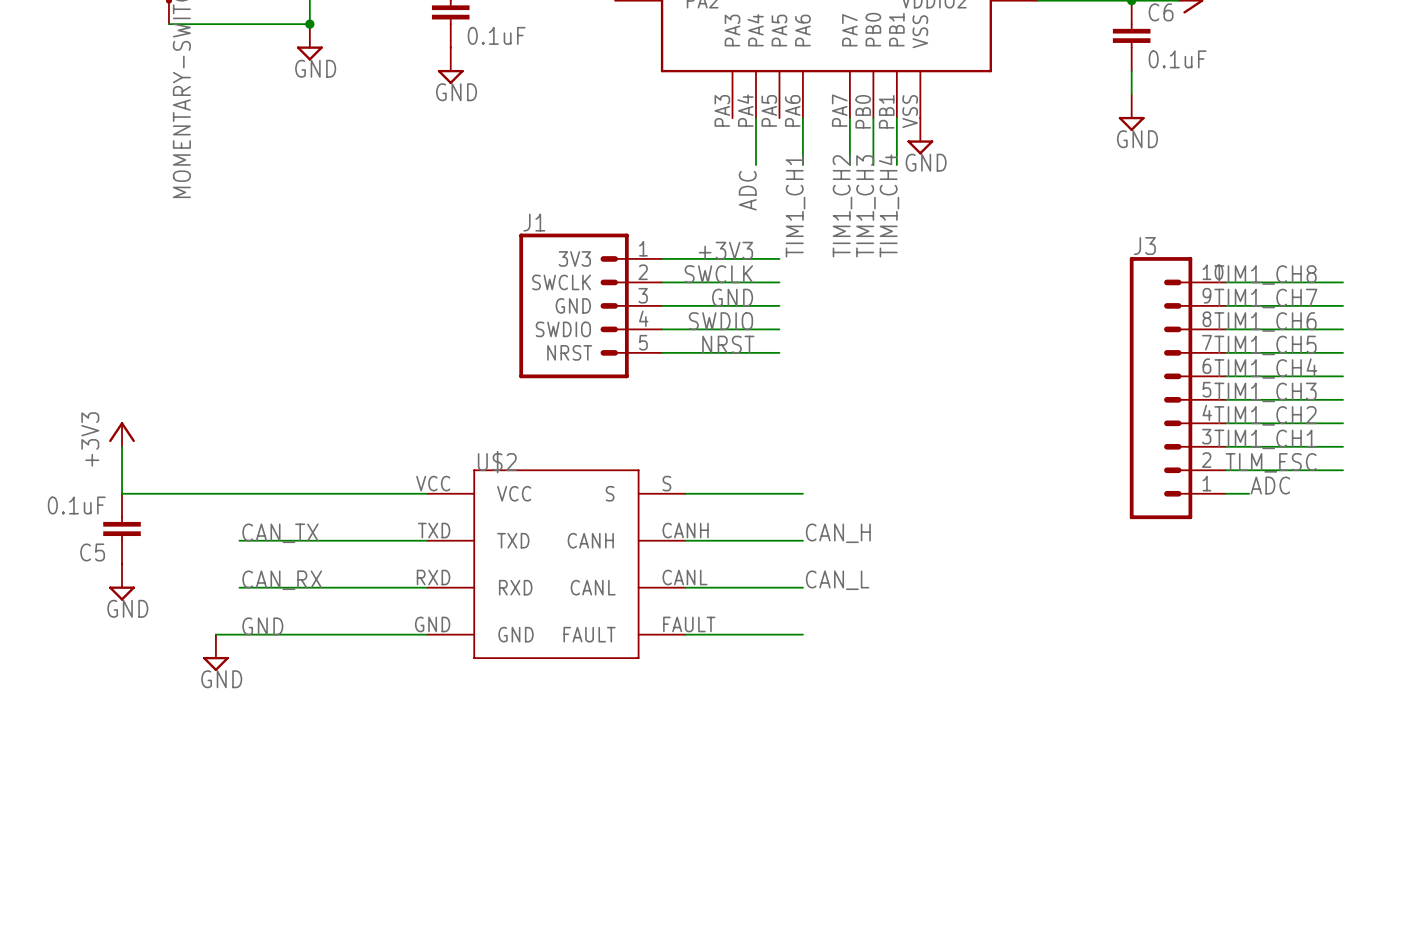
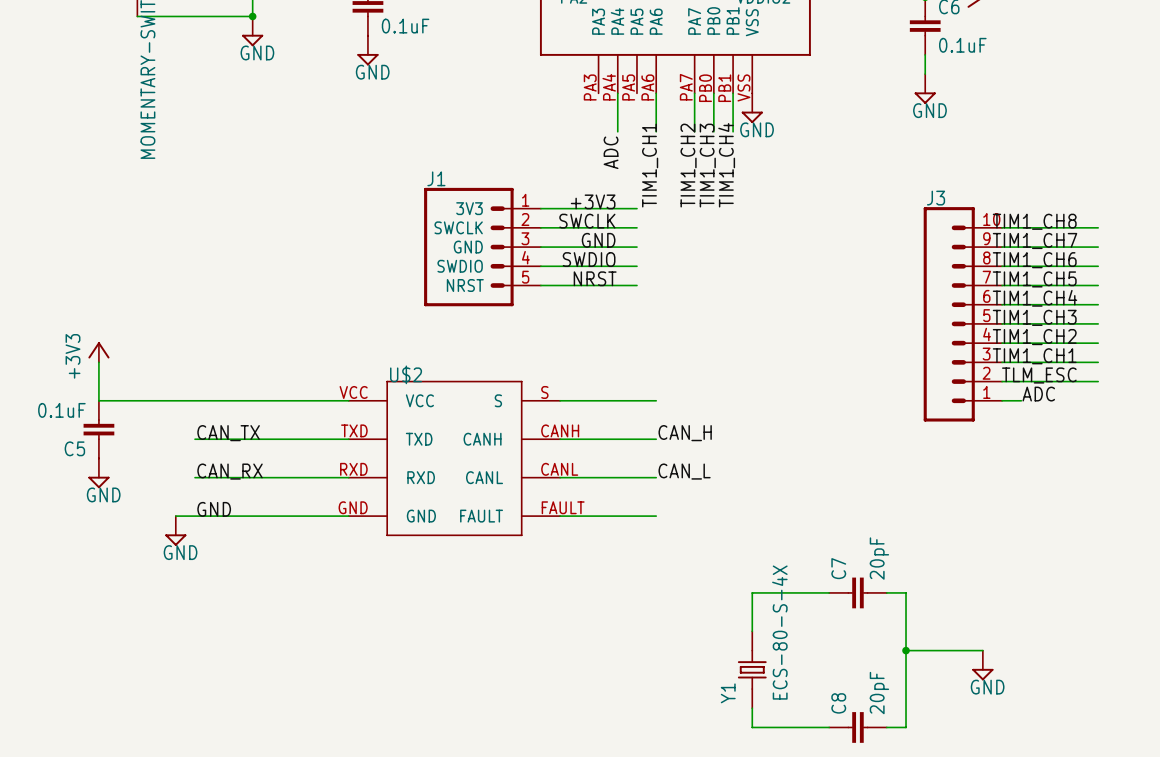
wire: none -> (829, 592) (752, 592) (752, 631)
C7: none -> 20pF (857, 592)
wire: none -> (886, 592) (906, 592) (906, 727) (886, 727)
wire: none -> (906, 650) (982, 650)
junction: none -> (906, 650)
power symbol: none -> GND (982, 665)
Y1: none -> ECS-80-S-4X (752, 669)
wire: none -> (752, 708) (752, 727) (829, 727)
C8: none -> 20pF (857, 727)

